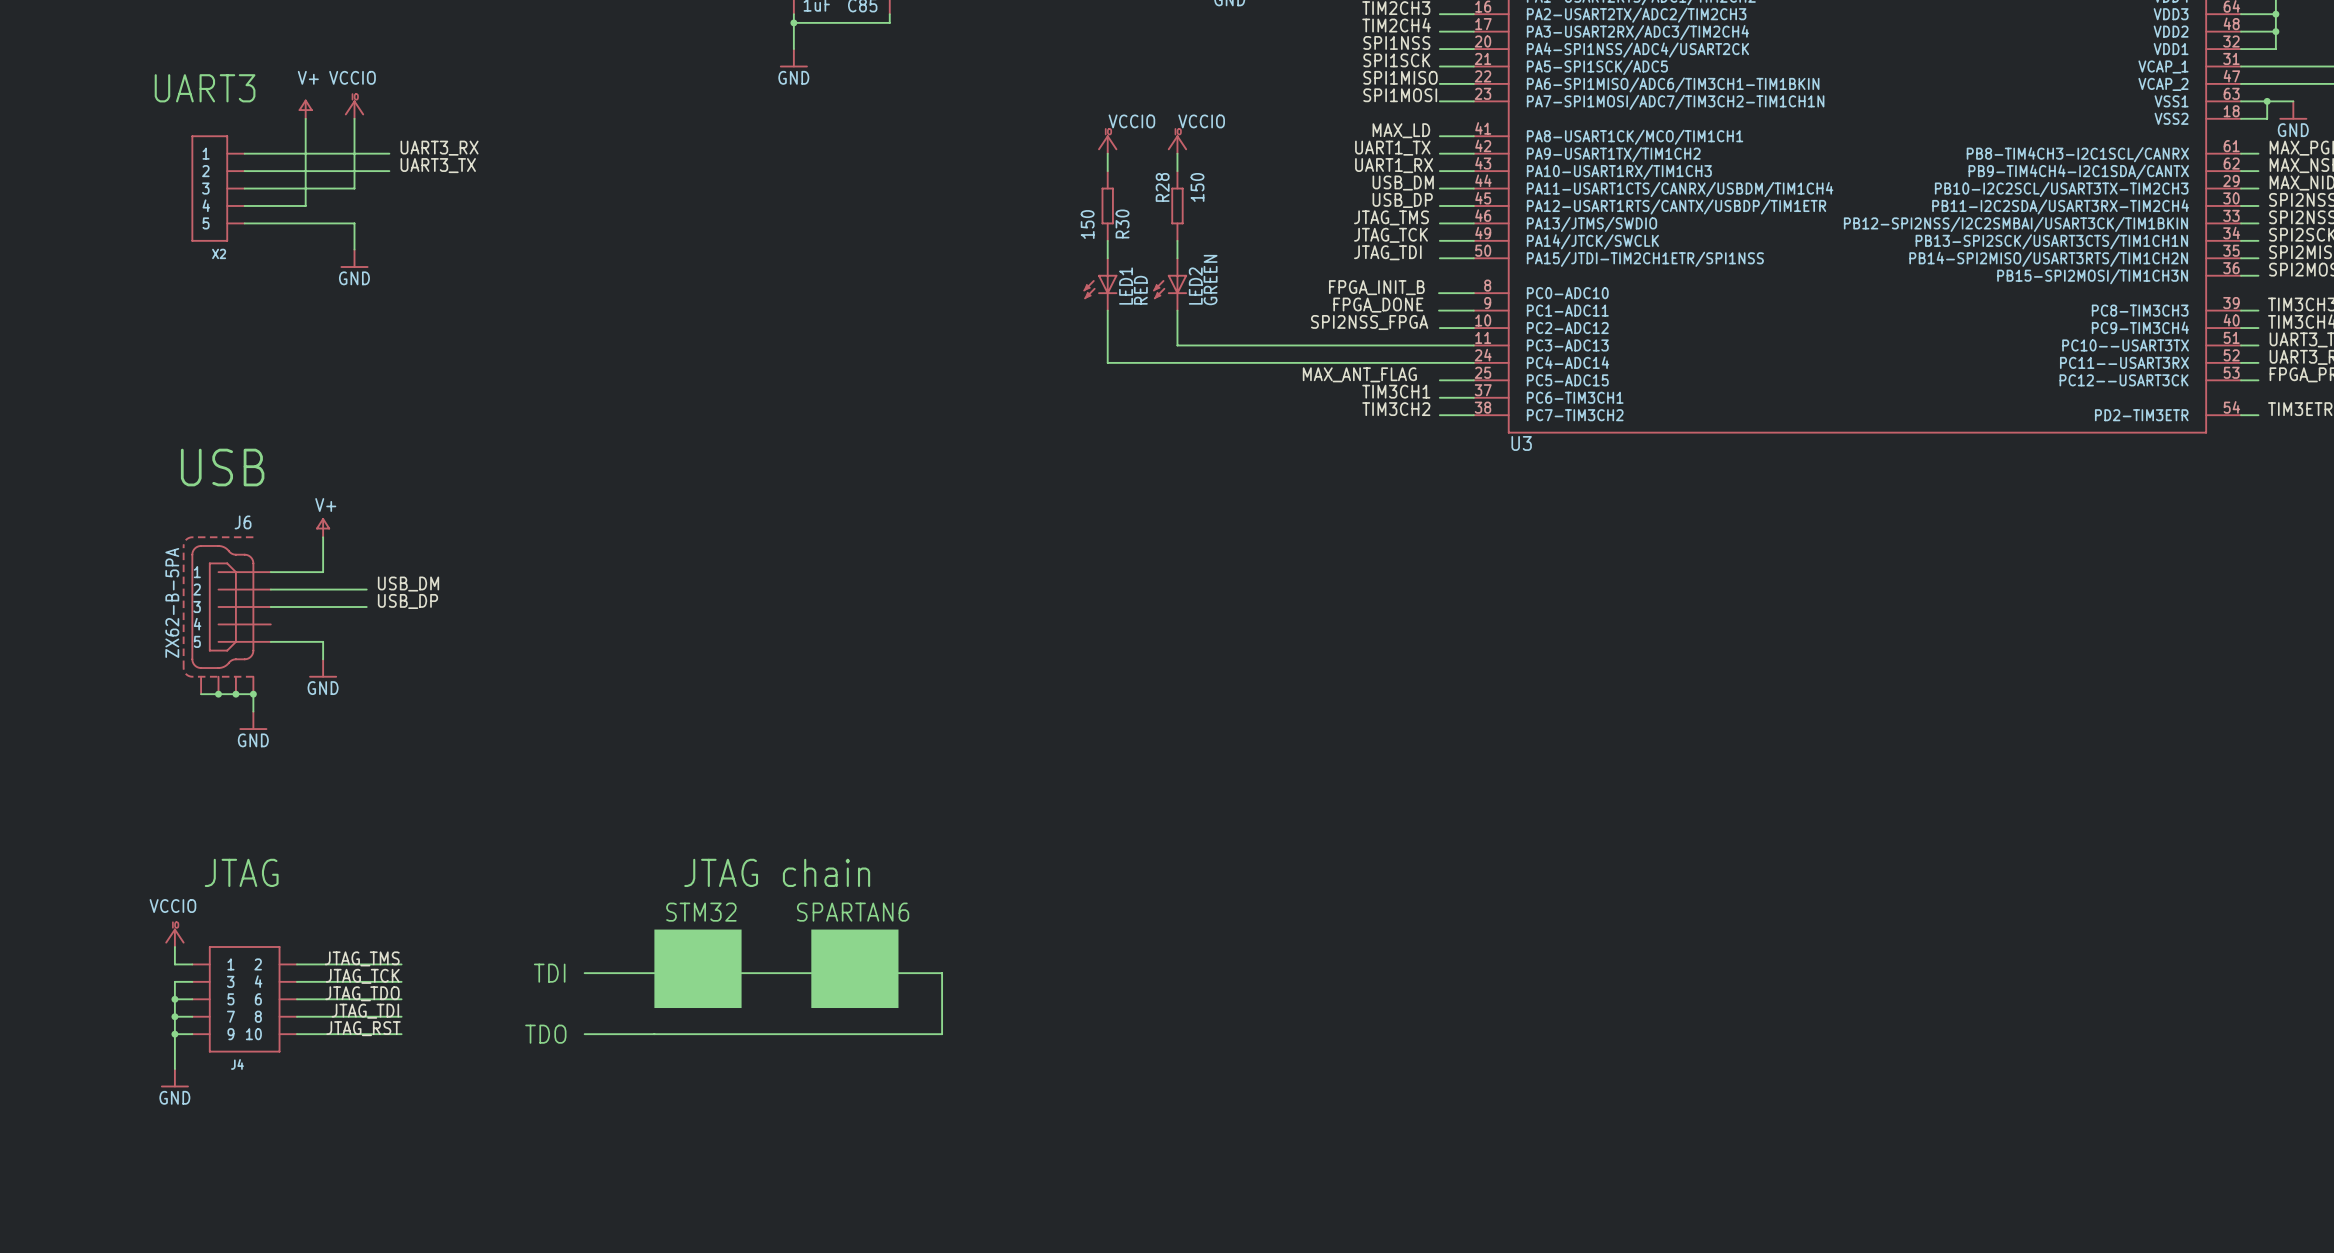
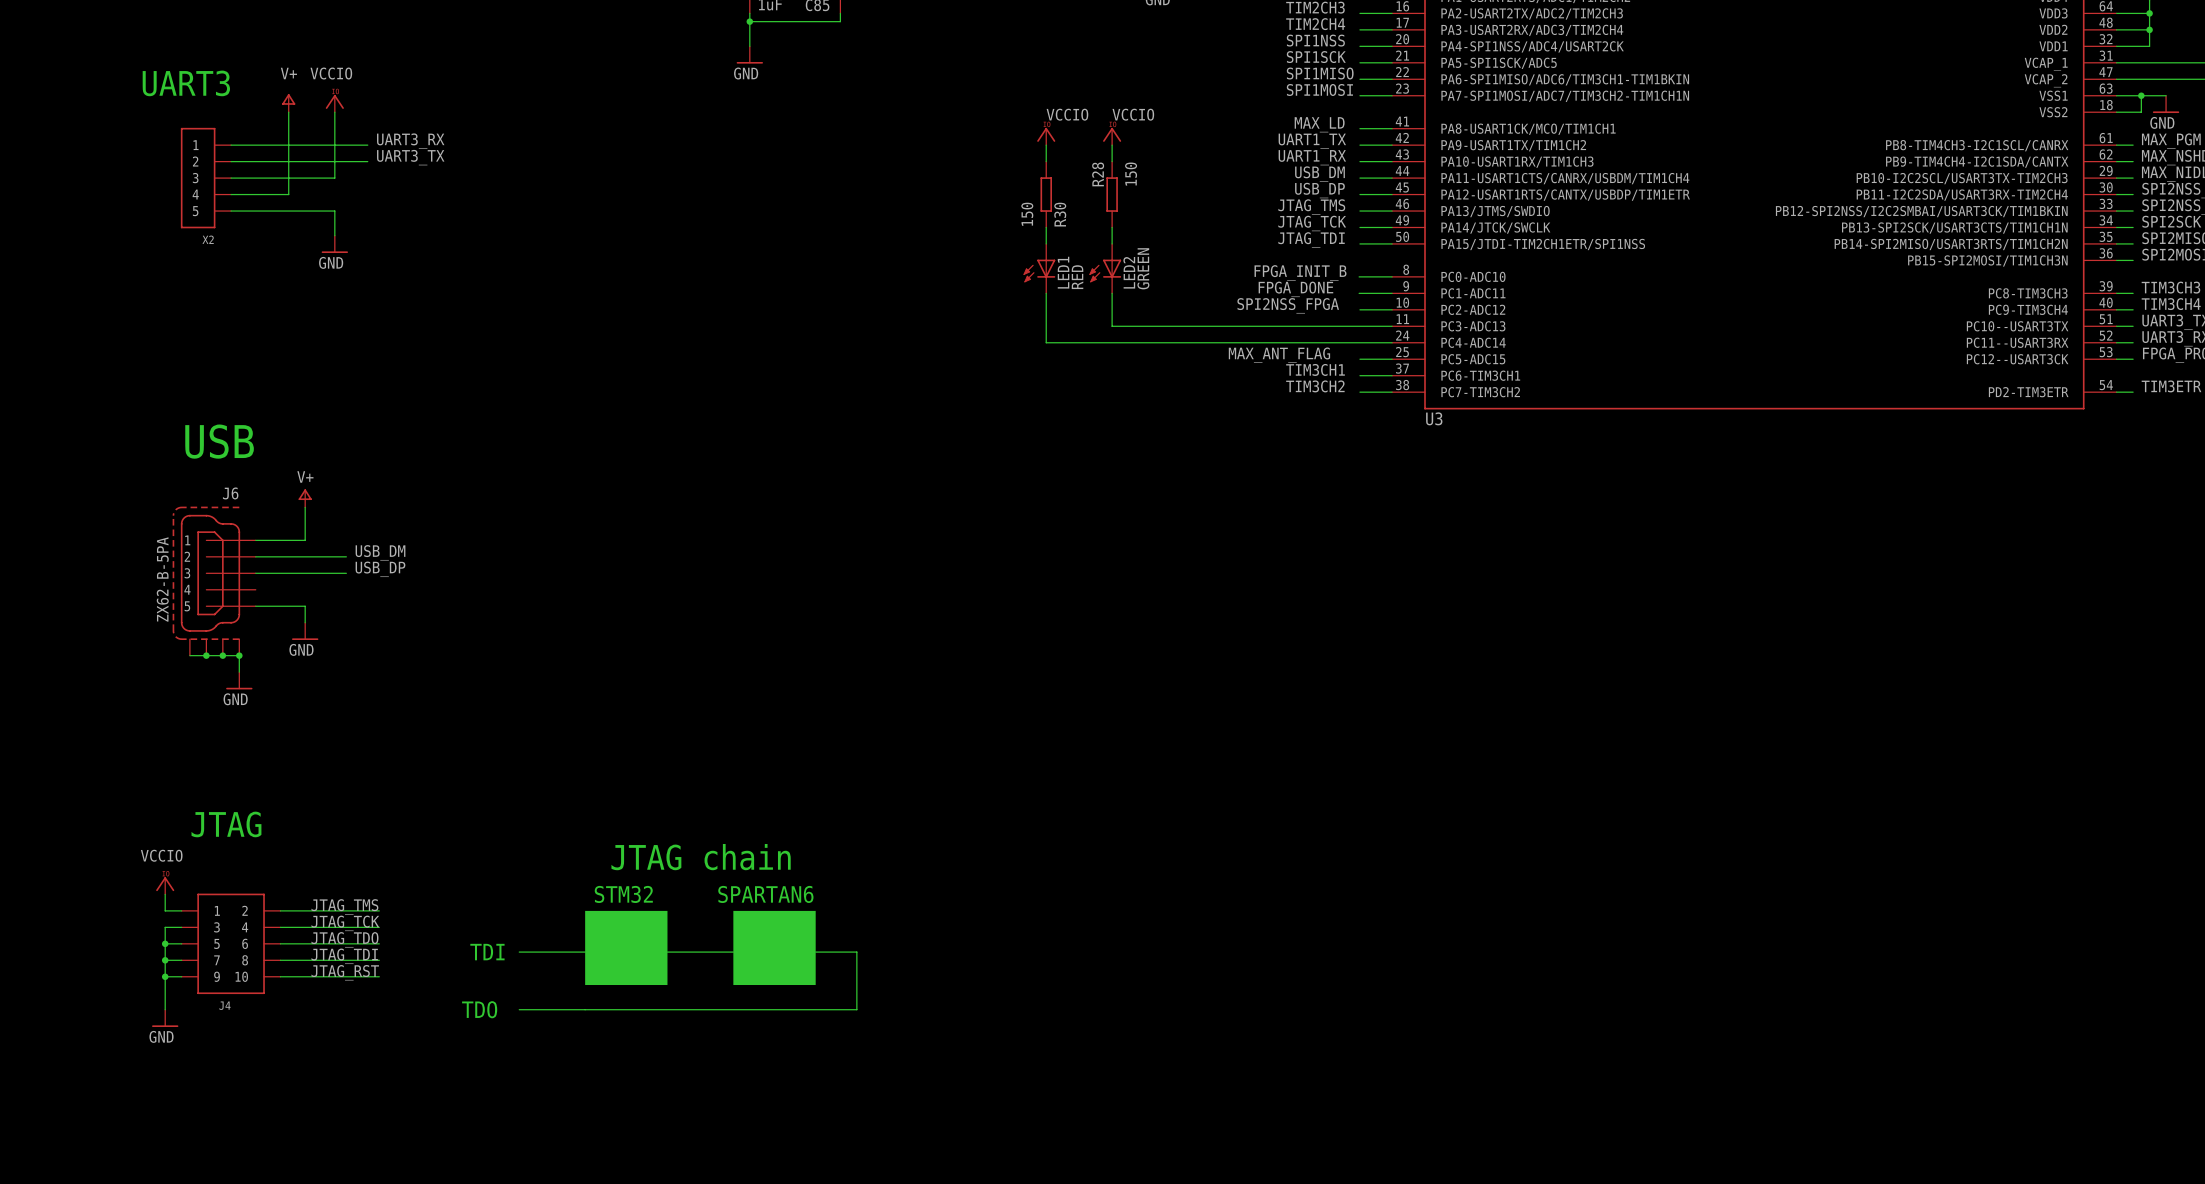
text position: JTAG chain (777, 872) -> JTAG chain (701, 857)
text position: STM32 (701, 912) -> STM32 (623, 894)
text position: SPARTAN6 (853, 912) -> SPARTAN6 (765, 894)
drawing position: (697, 968) -> (626, 947)
drawing position: (854, 968) -> (774, 947)
text position: TDI (549, 973) -> TDI (487, 952)
wire: (584, 973) (654, 973) -> (519, 952) (585, 952)
wire: (741, 973) (811, 973) -> (667, 952) (733, 952)
wire: (898, 973) (942, 973) (942, 1034) (584, 1034) -> (815, 952) (856, 952) (856, 1009) (519, 1009)
text position: TDO (545, 1034) -> TDO (479, 1009)

